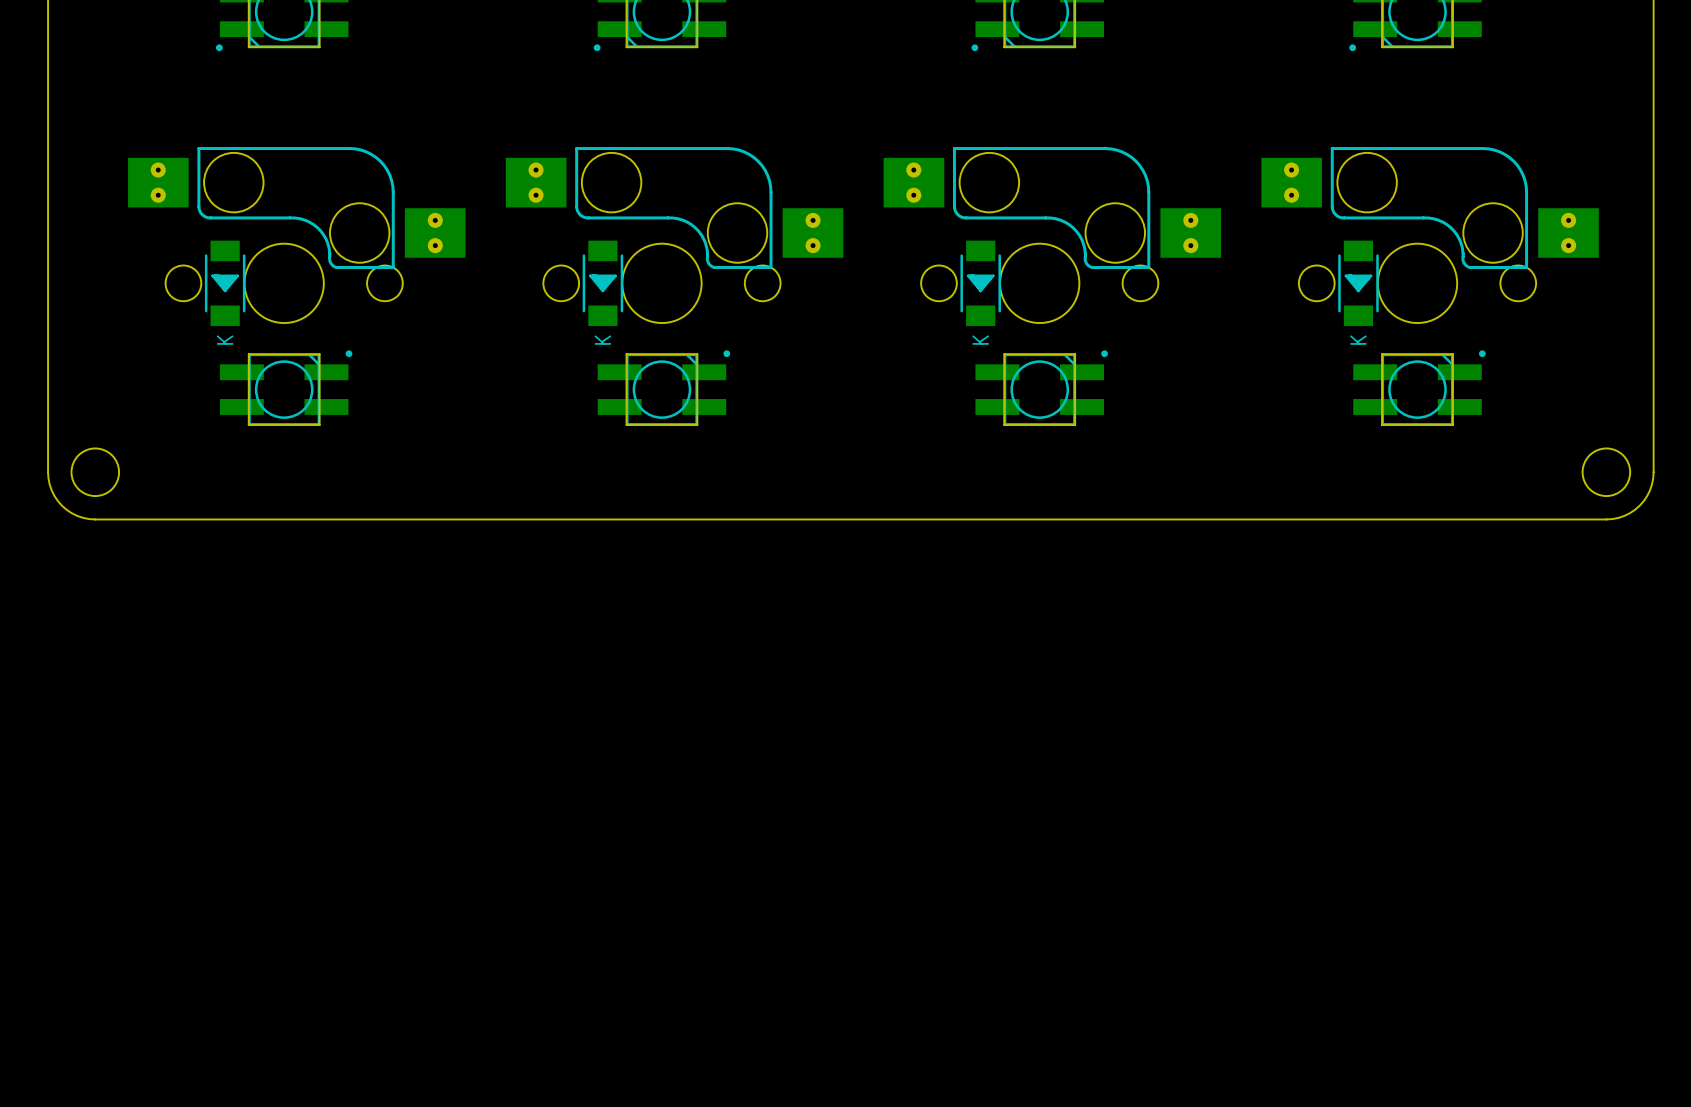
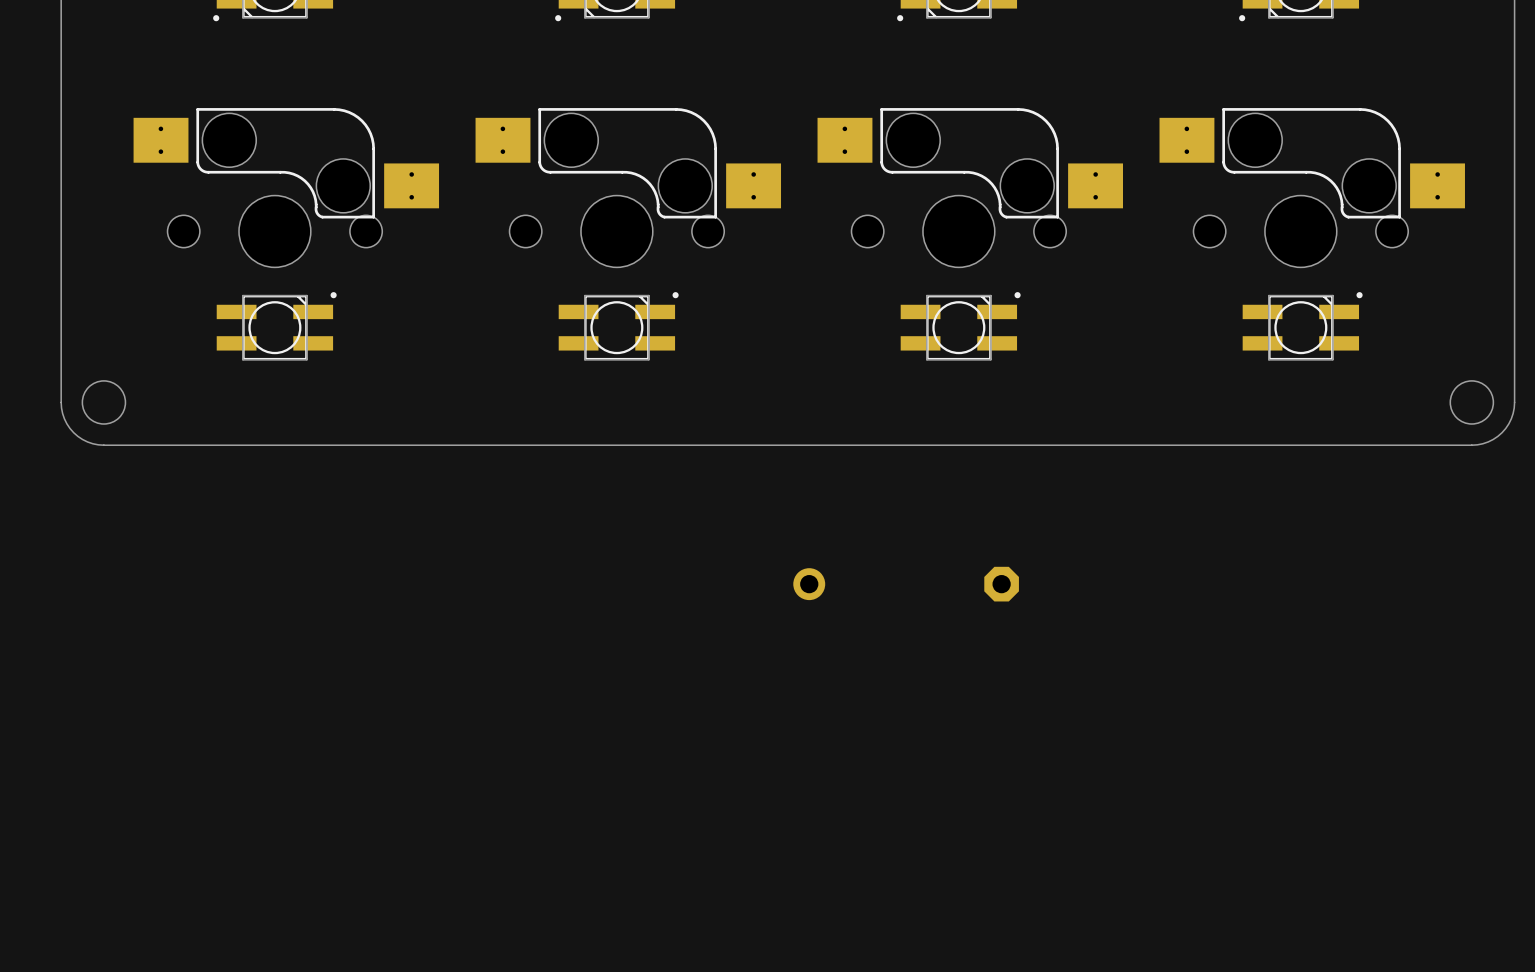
part: (225, 283) -> none
part: (602, 283) -> none
part: (980, 283) -> none
part: (1358, 283) -> none
part: none -> (809, 584)
part: none -> (1001, 584)

